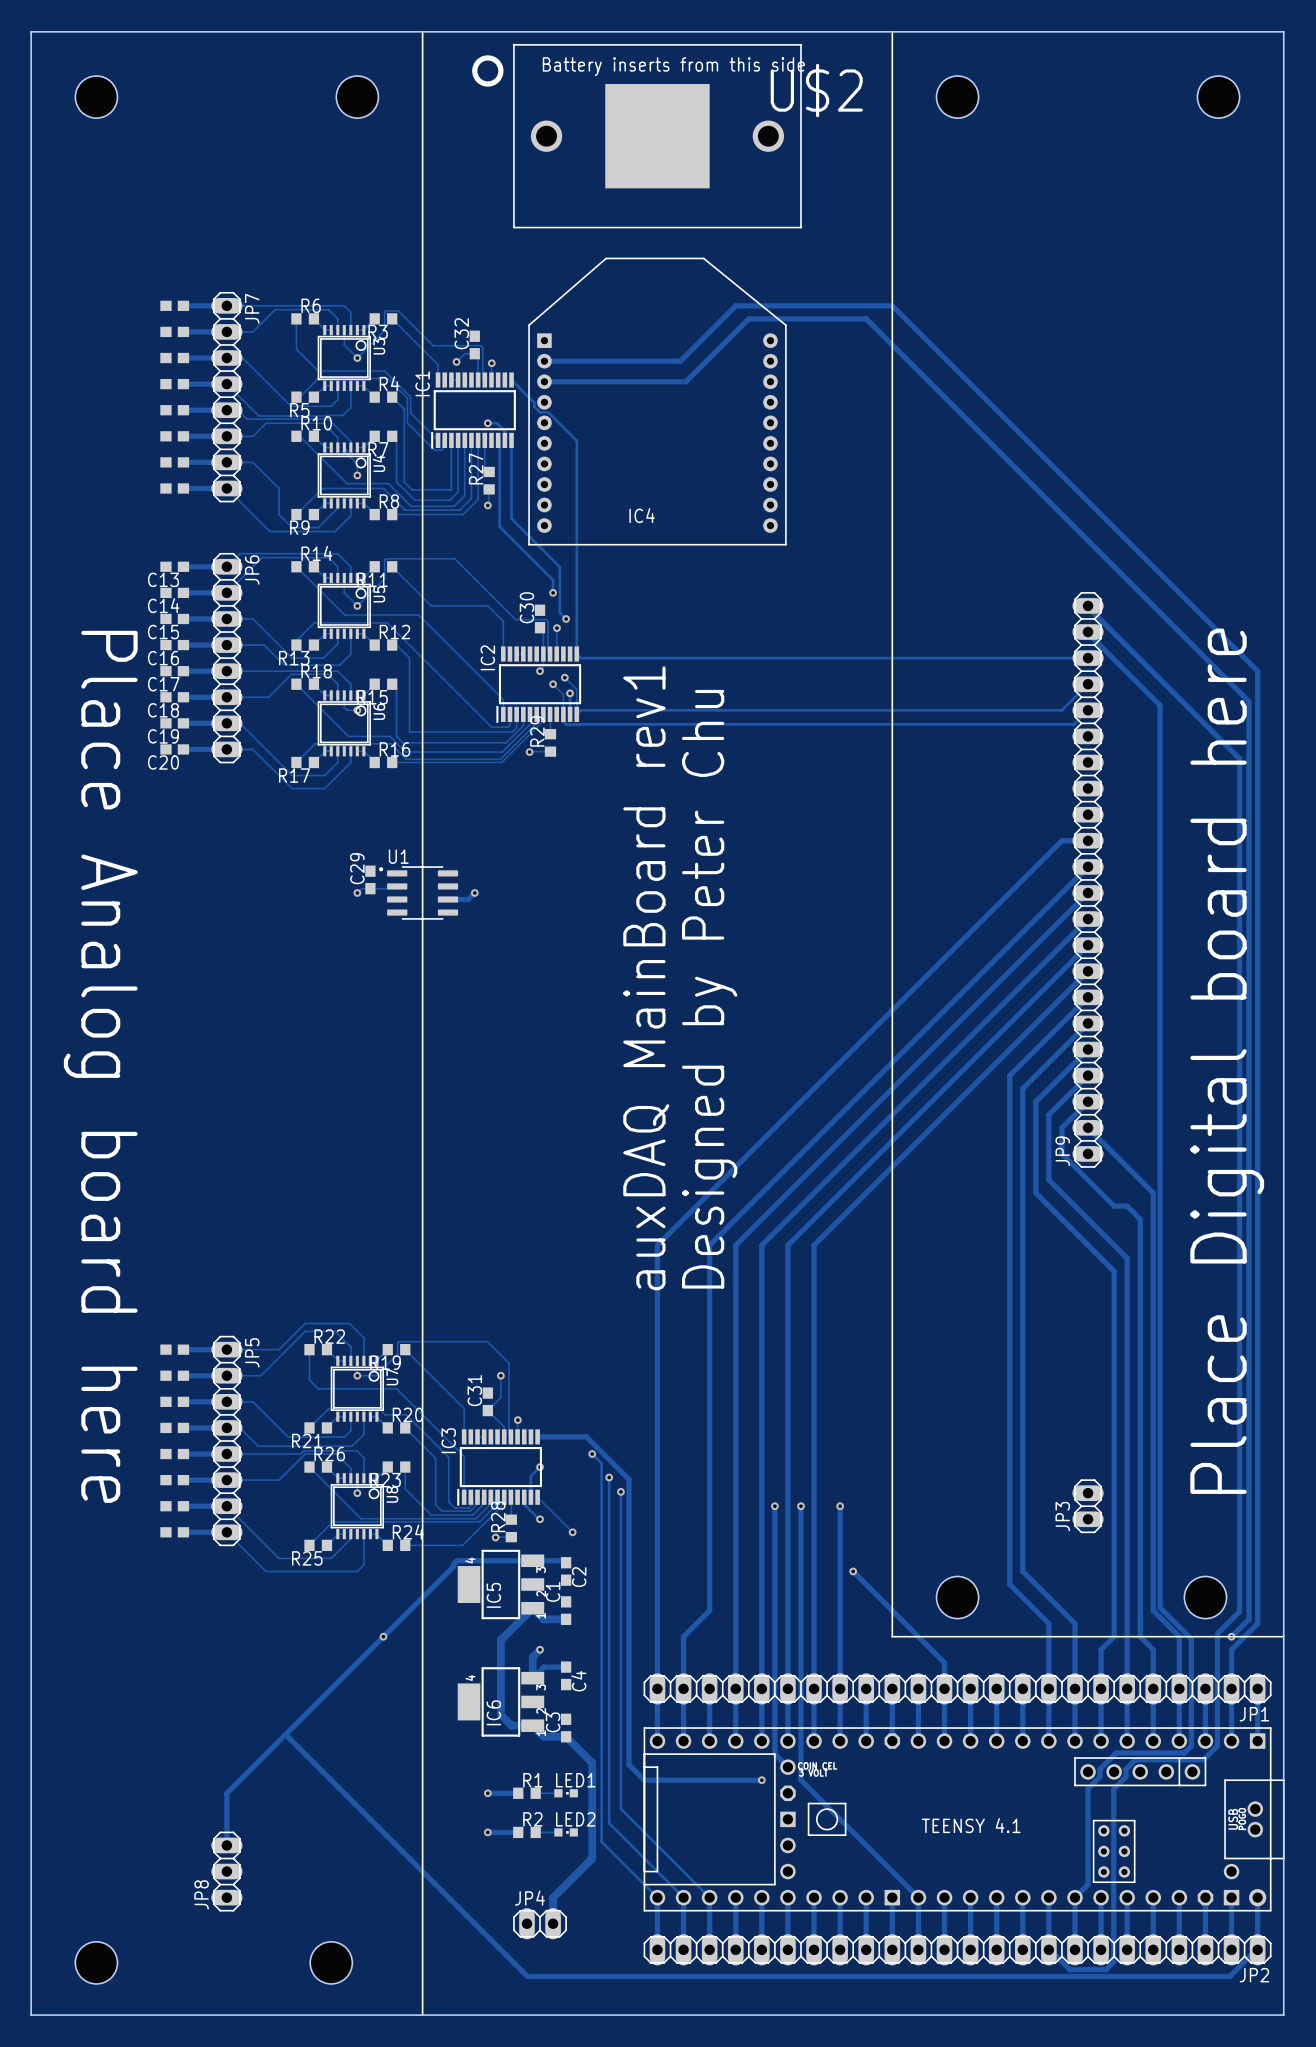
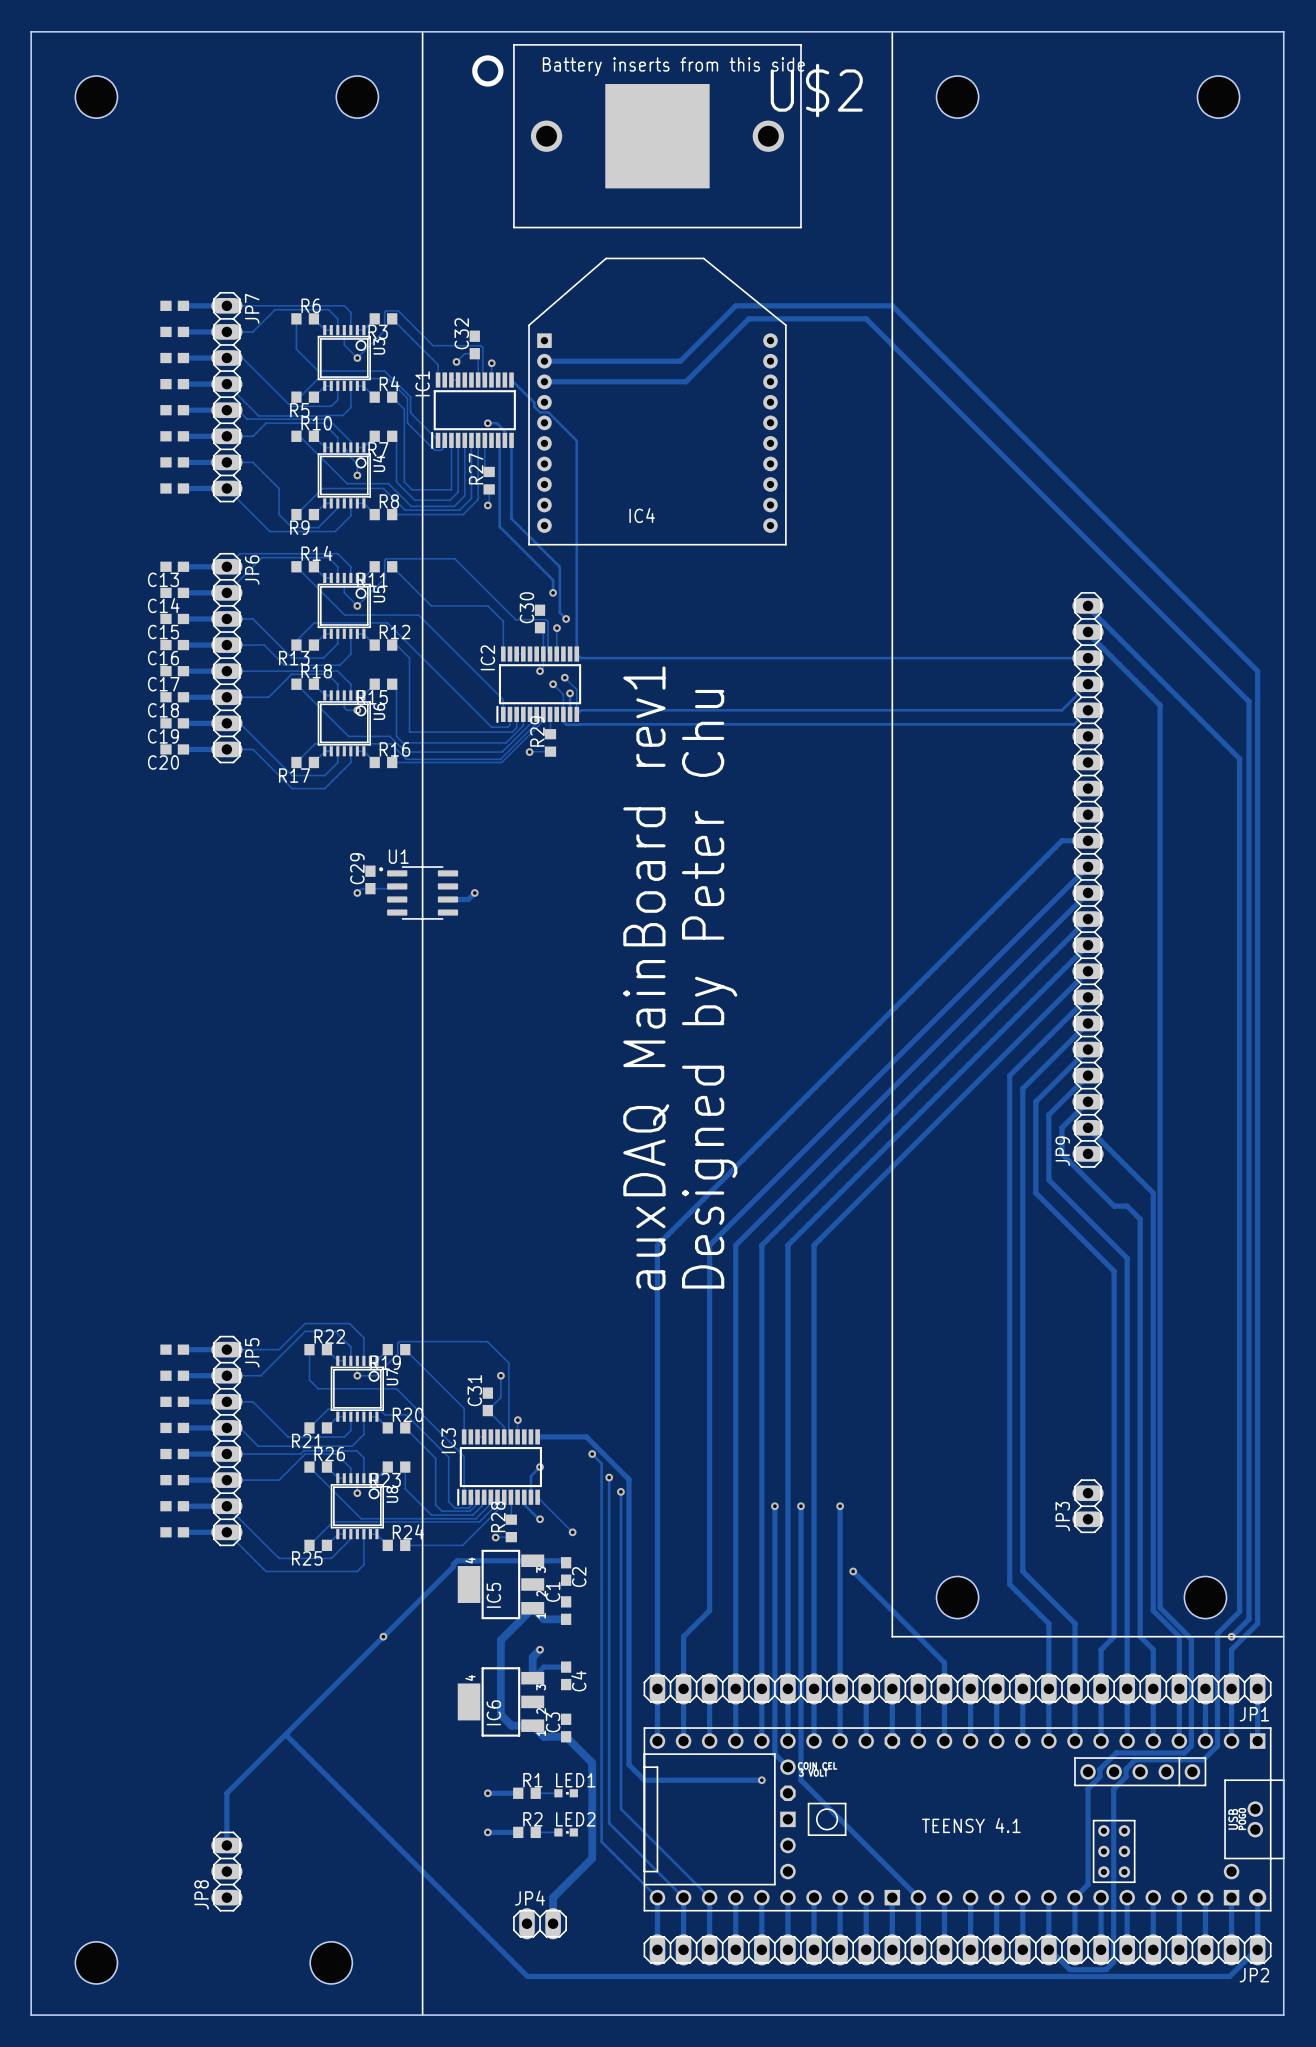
text: Place Digital board here (1227, 1061) -> none
text: Place Analog board here (100, 1066) -> none

